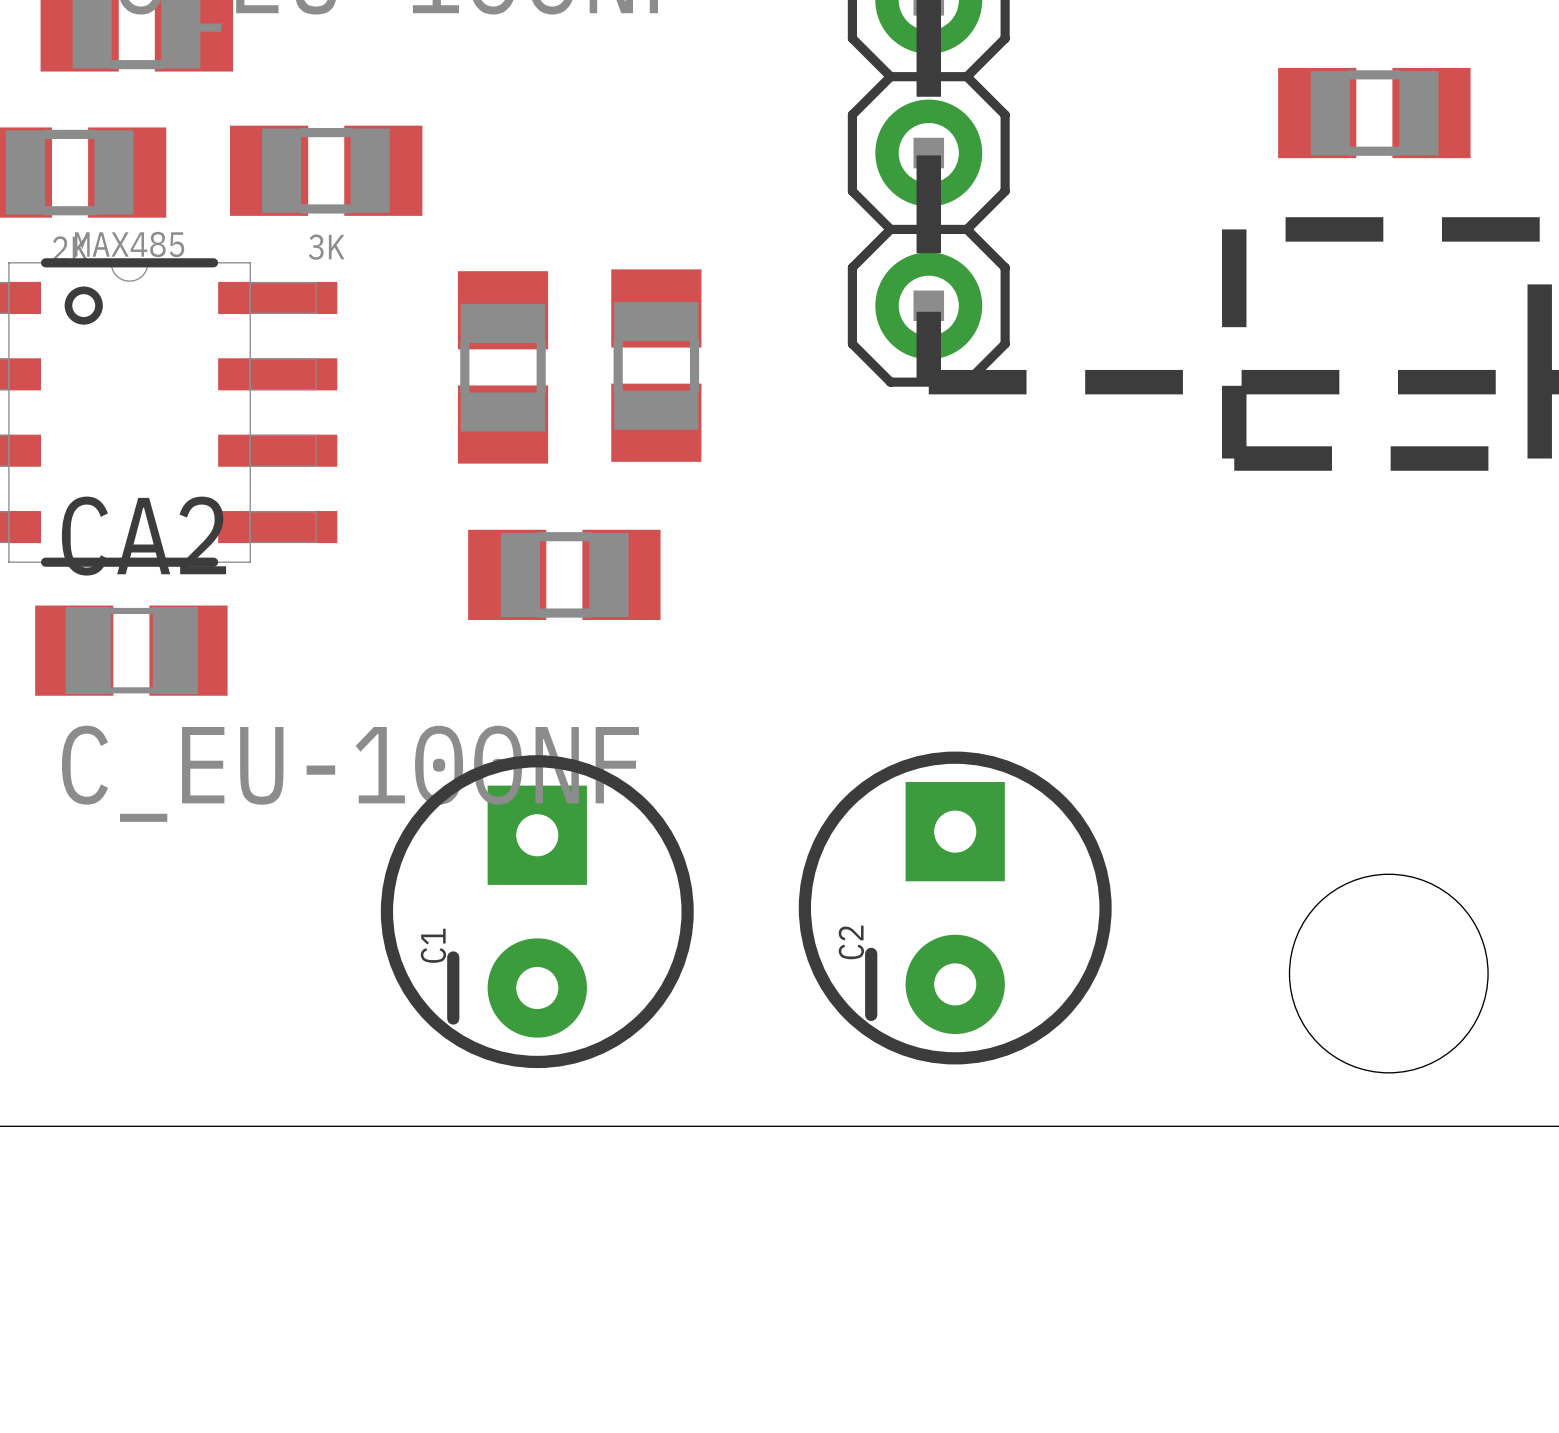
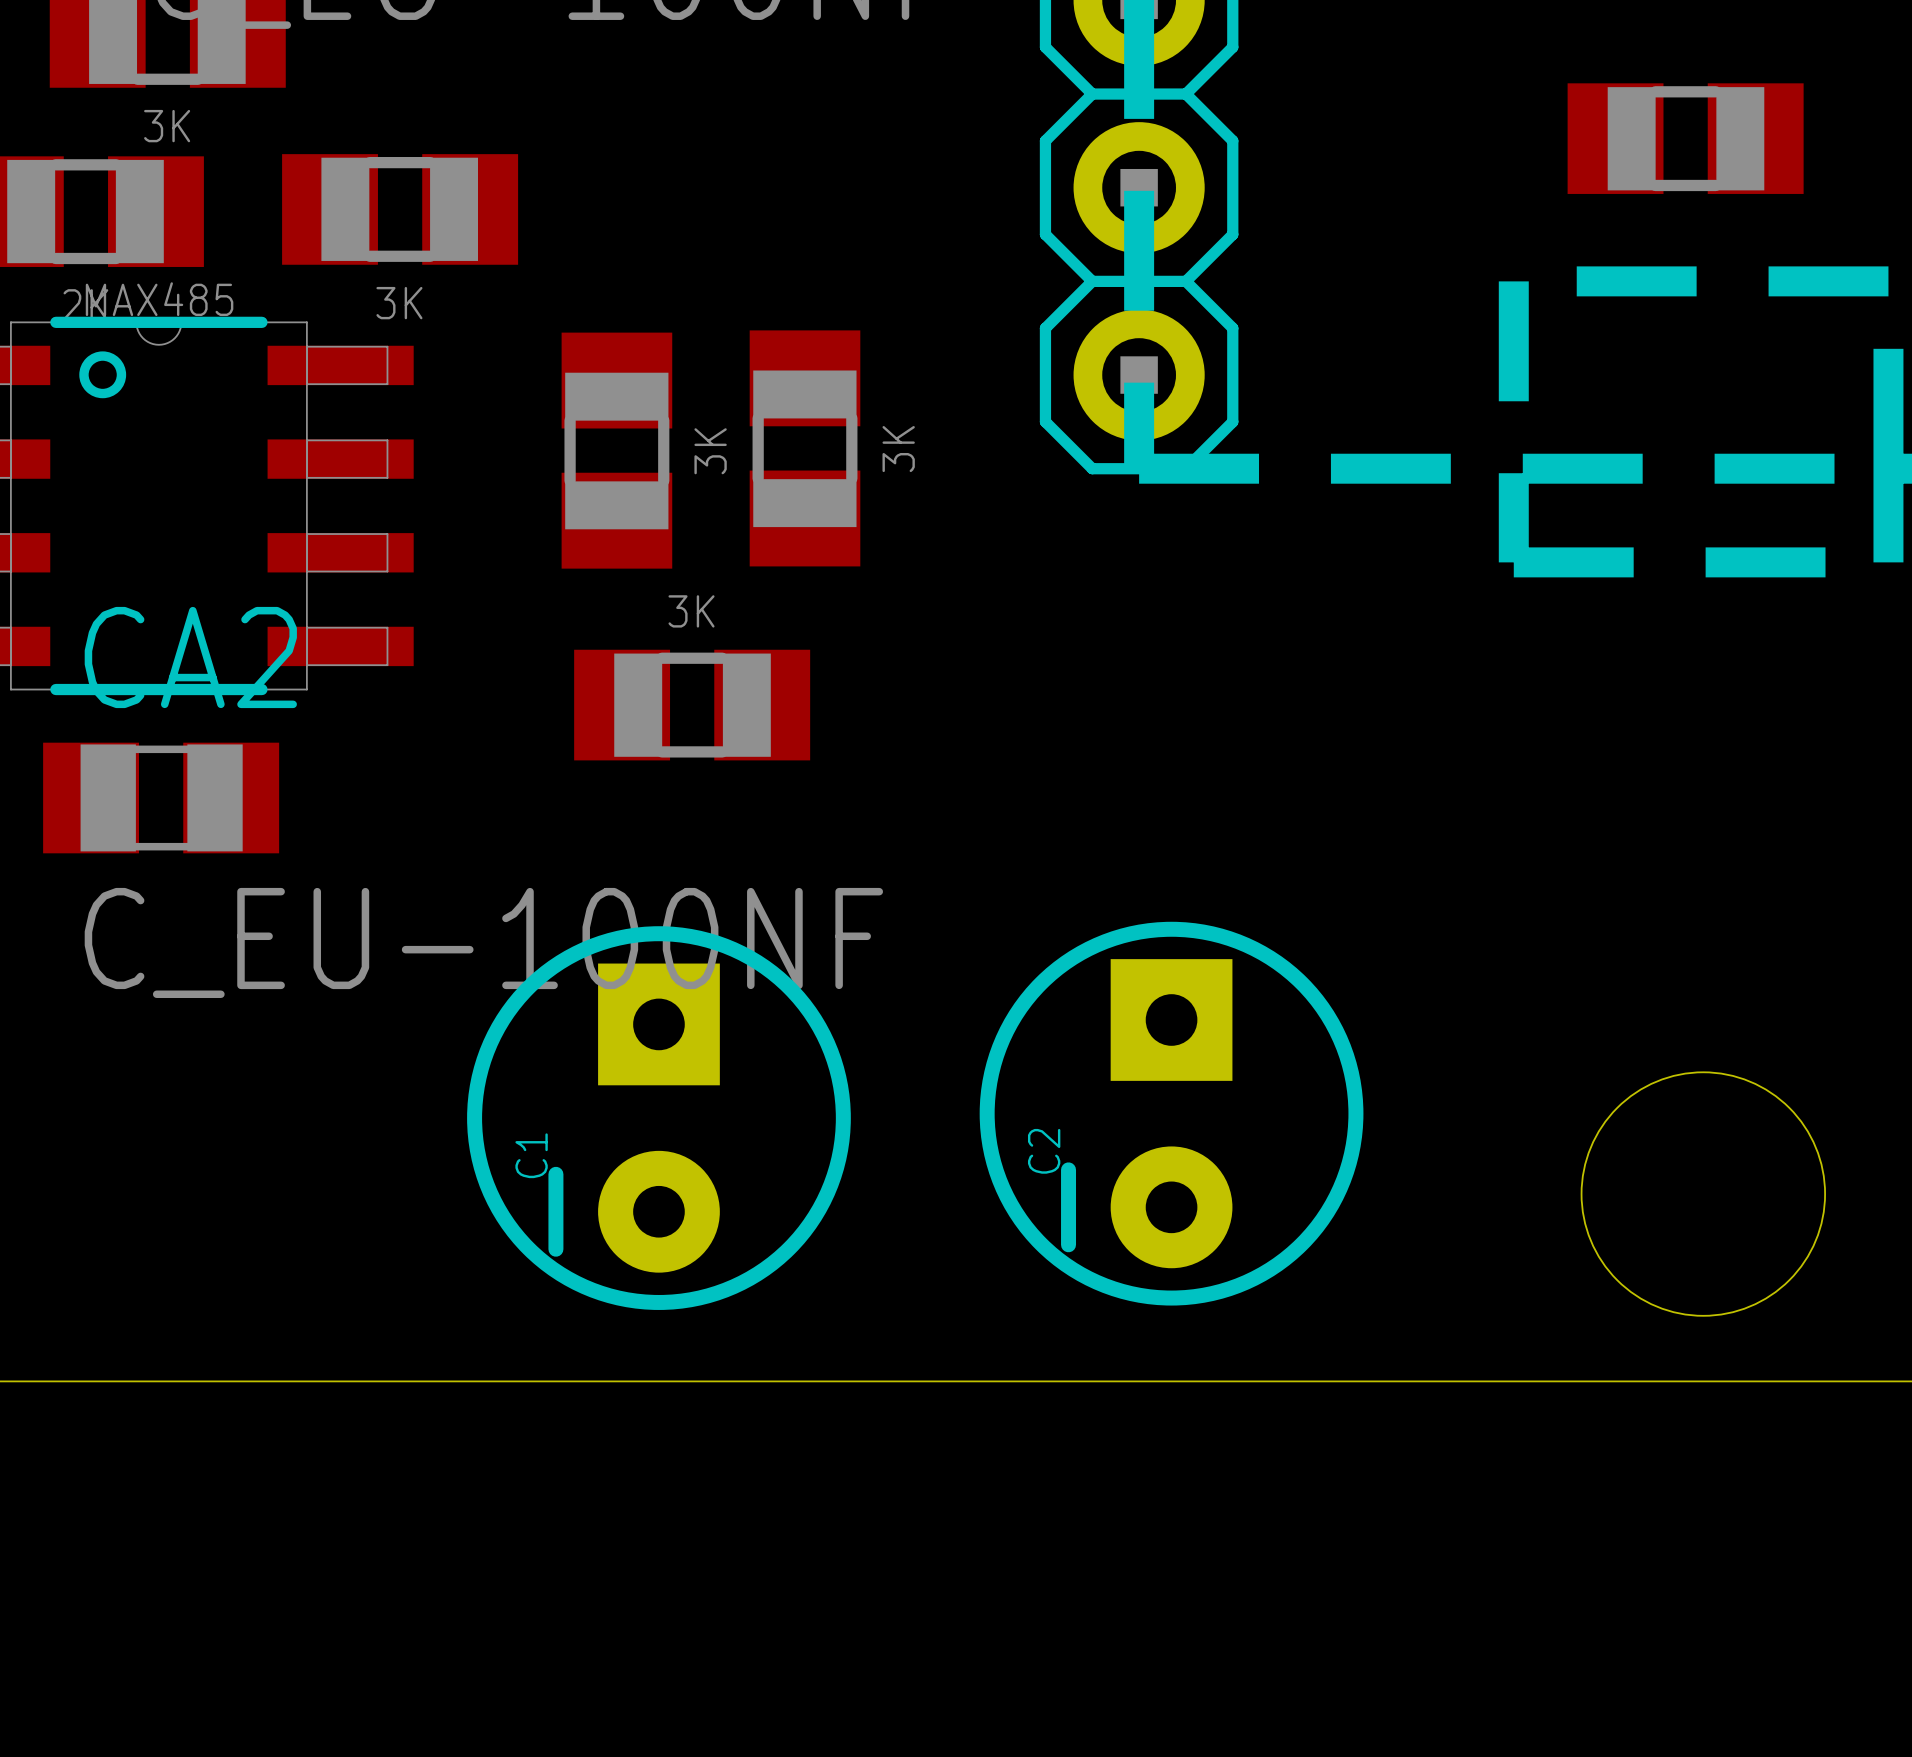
part value: none -> 3K (167, 126)
part value: none -> 3K (898, 449)
part value: none -> 3K (710, 451)
part value: none -> 3K (691, 611)

